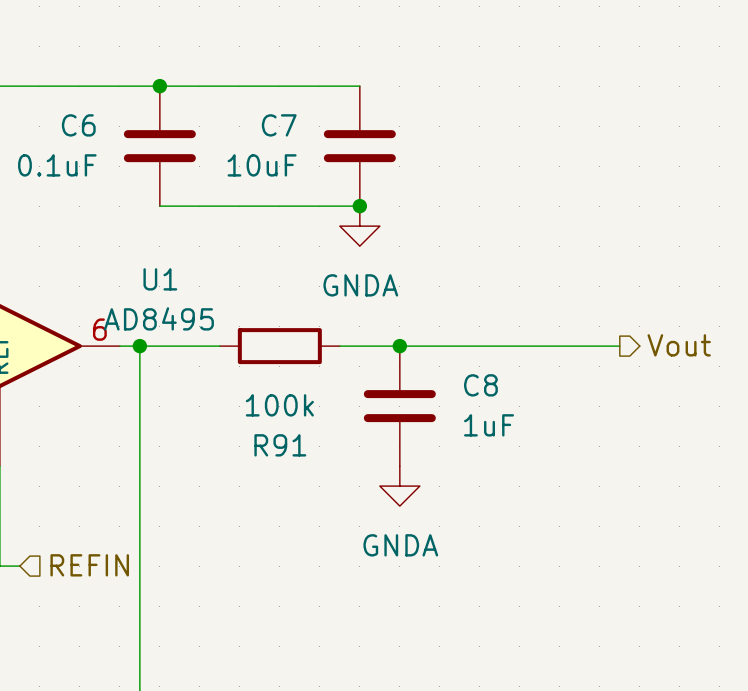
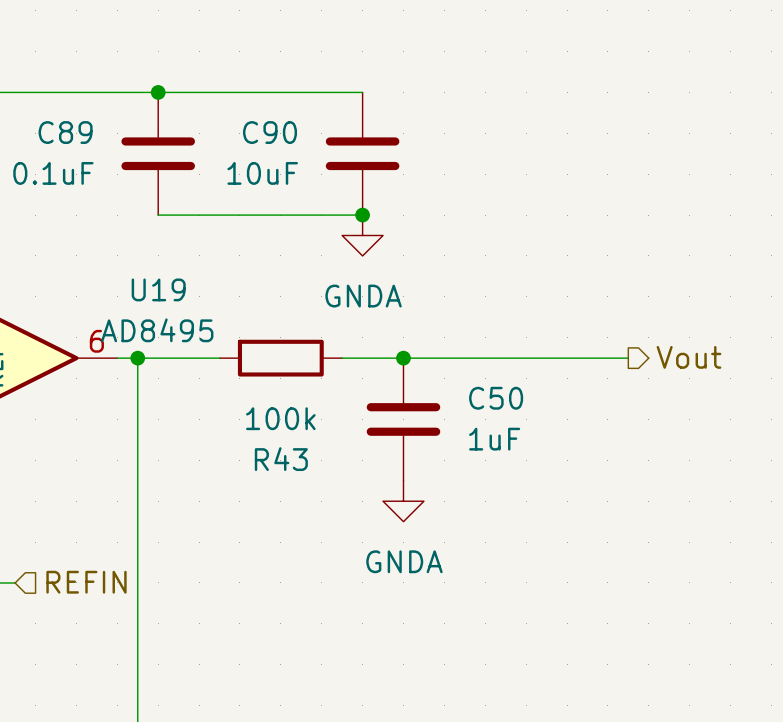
C6 name: C6 (78, 125) -> C89 (65, 132)
C7 name: C7 (279, 125) -> C90 (269, 132)
U1 name: U1 (160, 279) -> U19 (158, 289)
C8 name: C8 (480, 385) -> C50 (496, 398)
R91 name: R91 (280, 445) -> R43 (281, 459)

